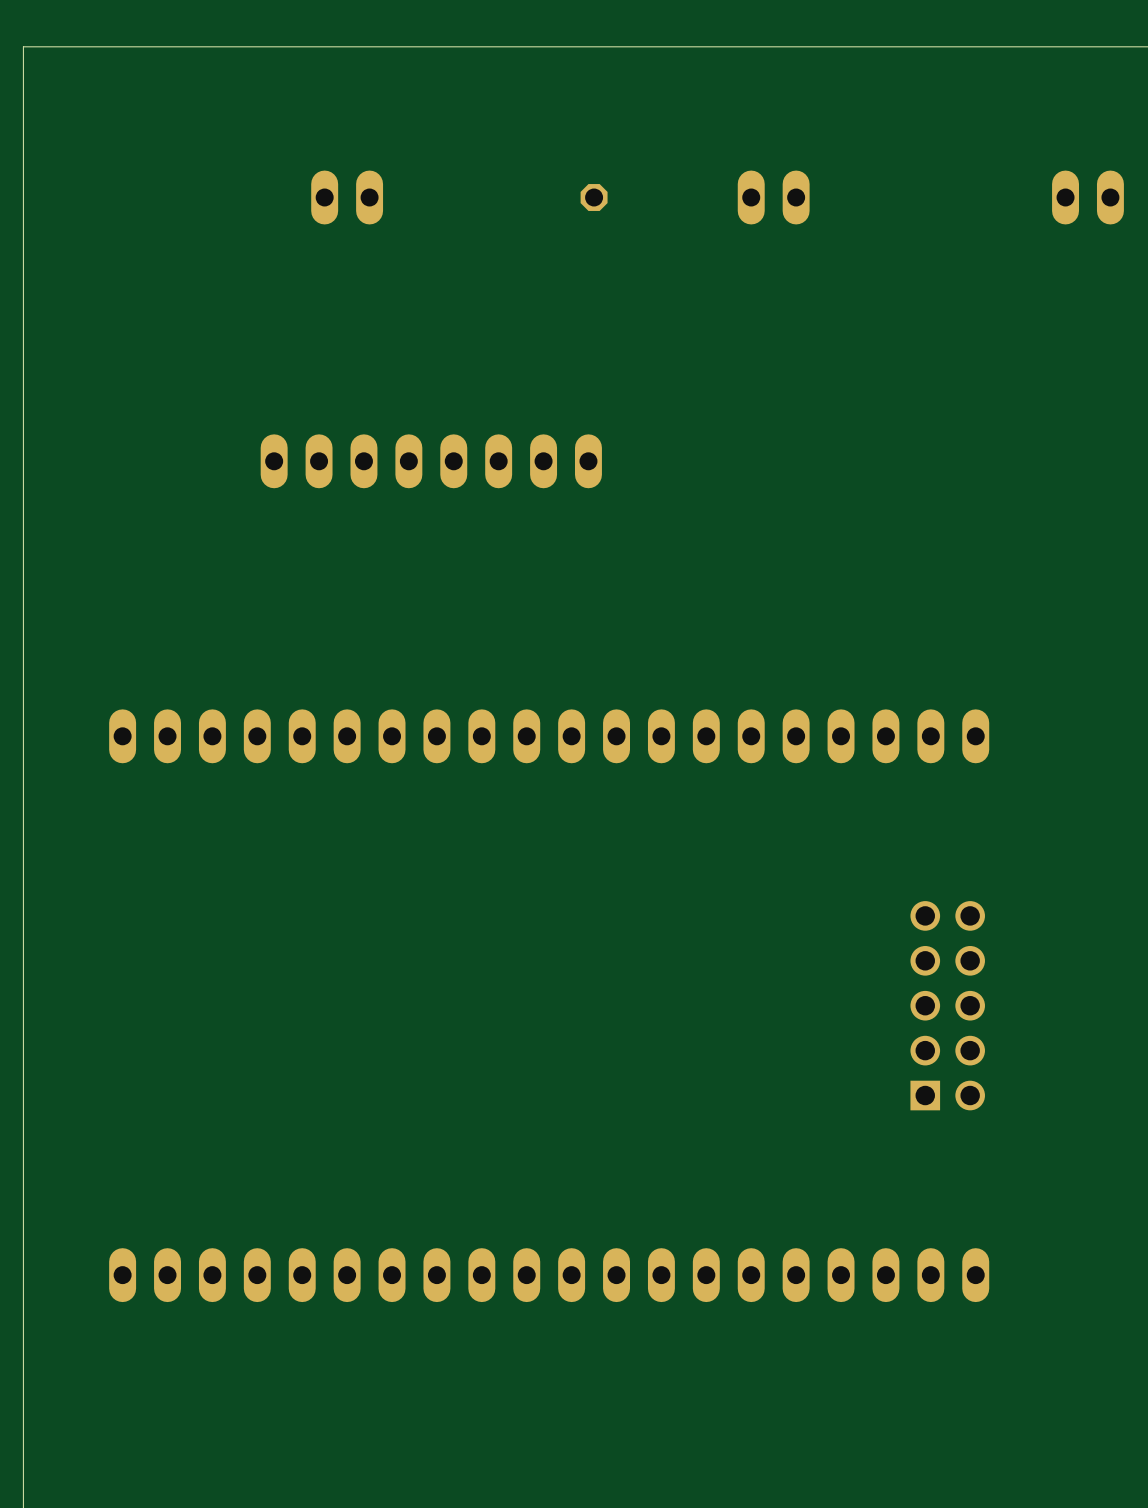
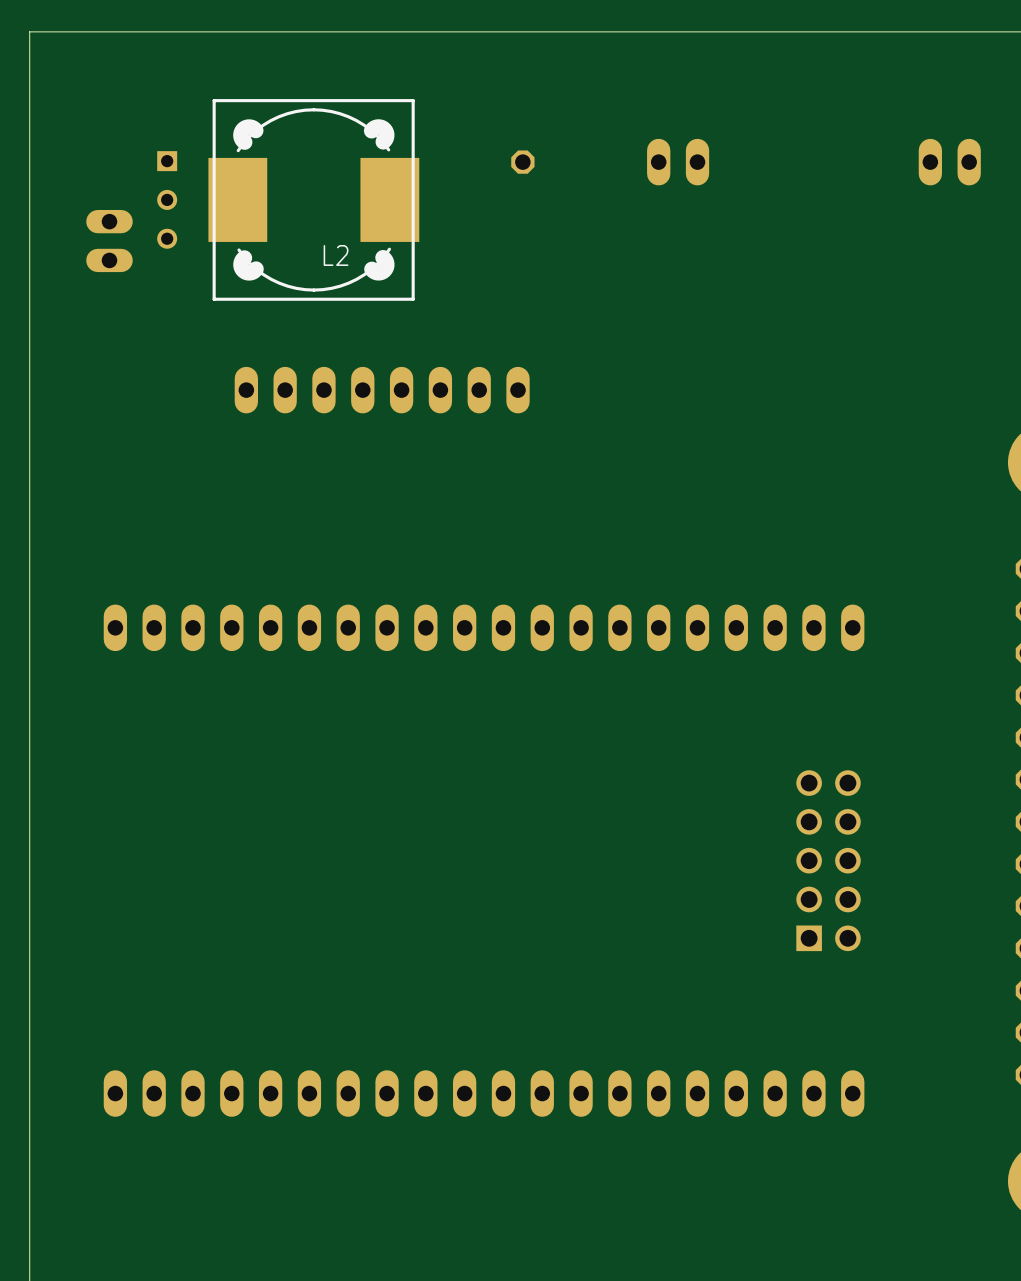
part rotation: 0° (347, 197) -> 90° clockwise (109, 241)
part position: (347, 197) -> (109, 241)
part: none -> (167, 199)
L2: none -> (313, 199)

